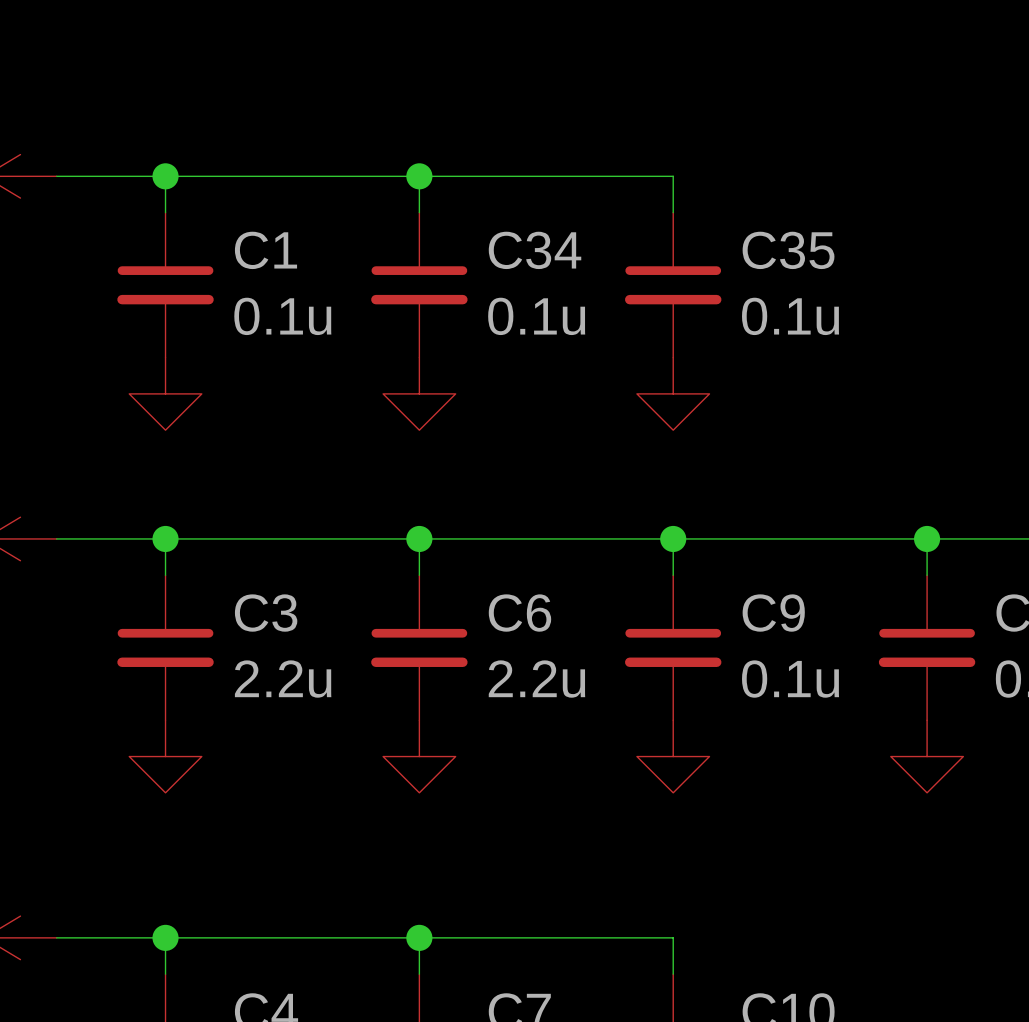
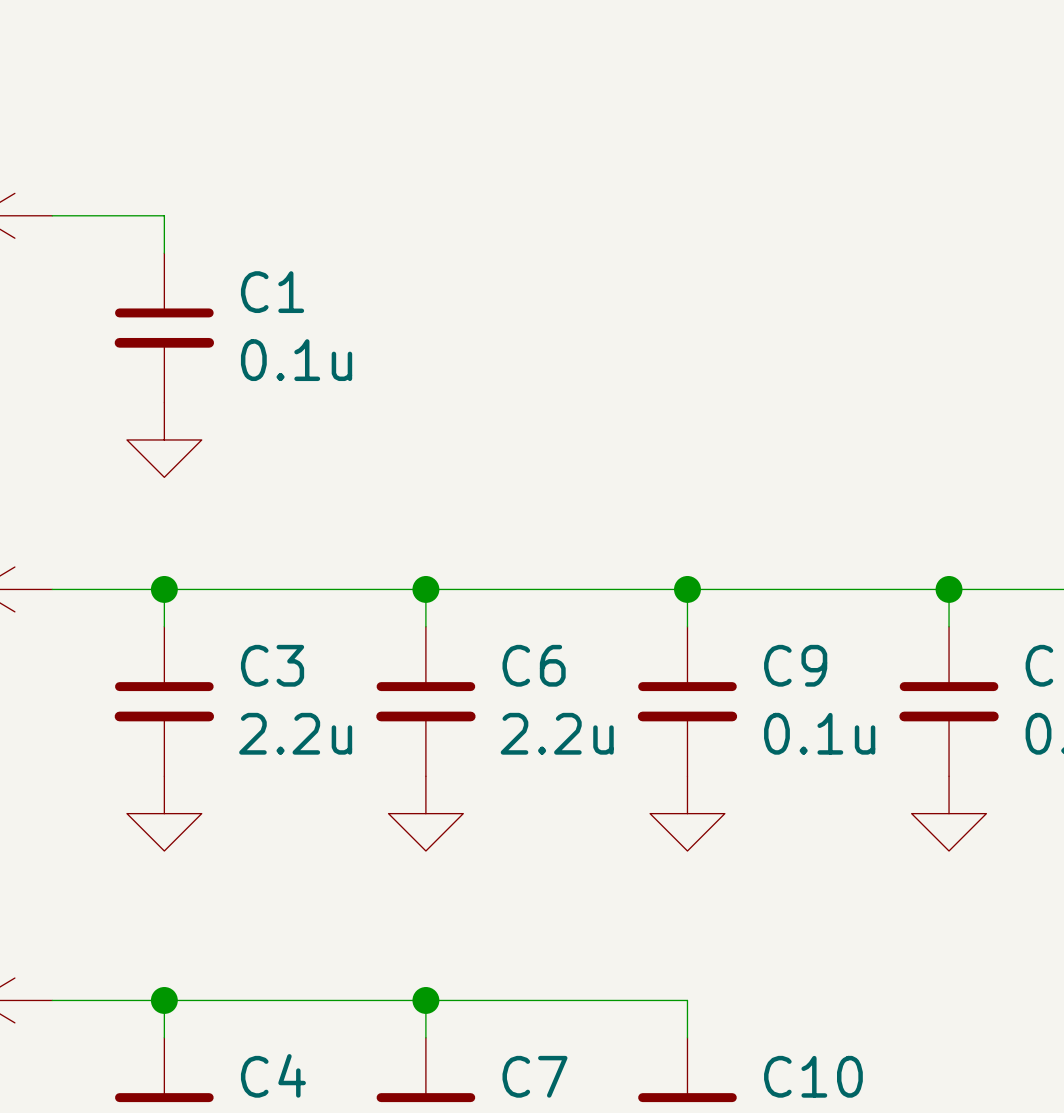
wire: (165, 176) (673, 176) (673, 212) -> none
junction: (165, 176) -> none
wire: (419, 176) (419, 212) -> none
junction: (419, 176) -> none
C34: 0.1u (419, 285) -> none
C35: 0.1u (673, 285) -> none
power symbol: (419, 393) -> none
power symbol: (673, 393) -> none

